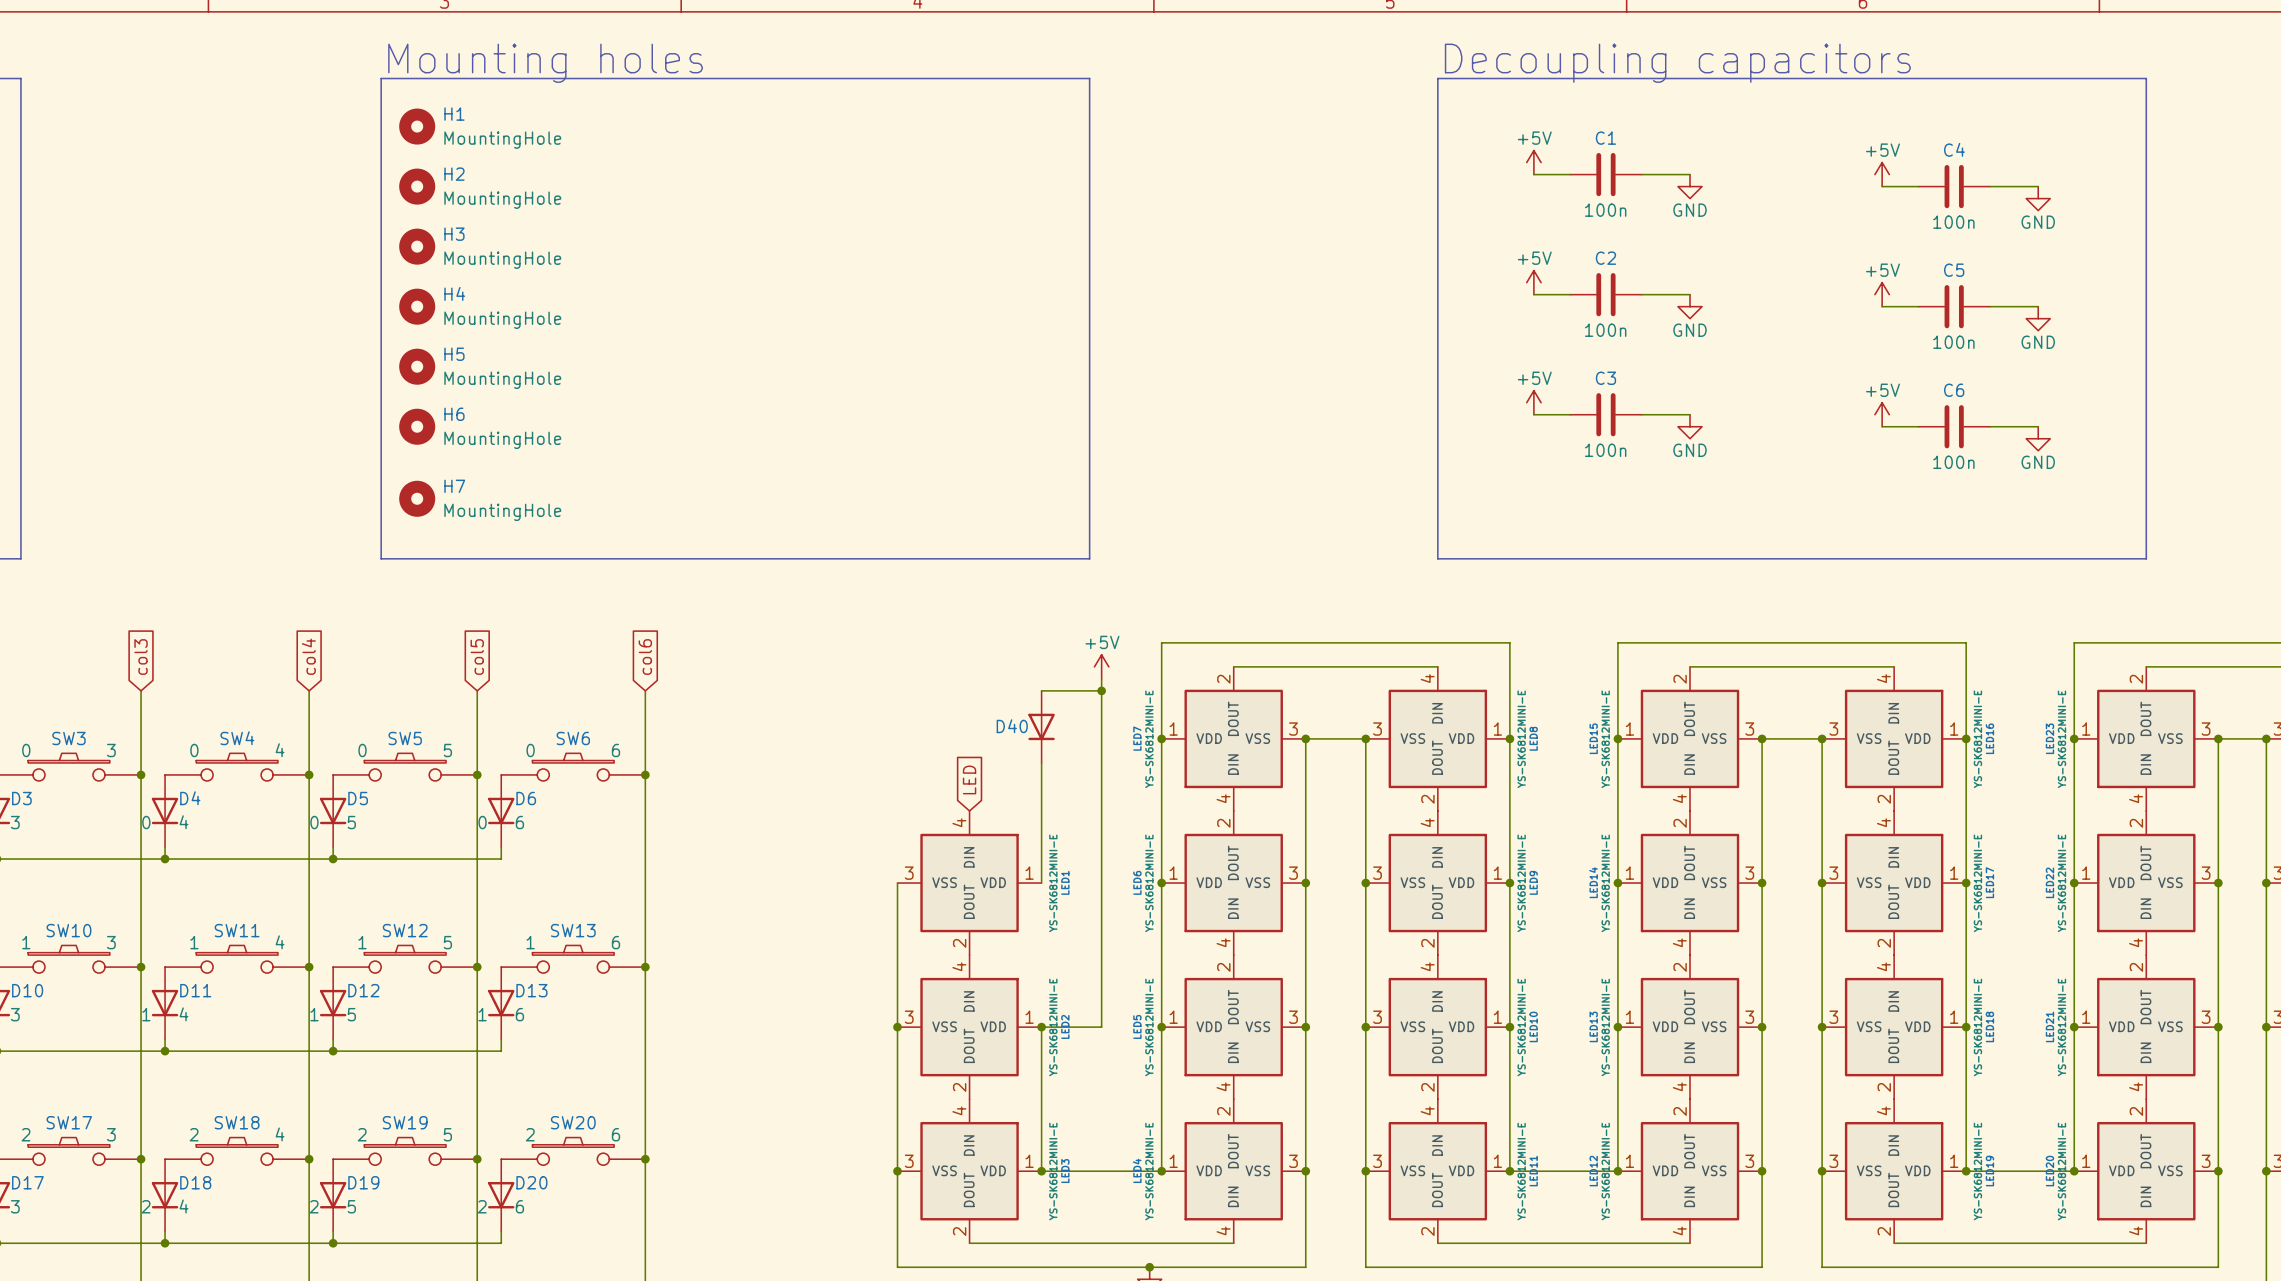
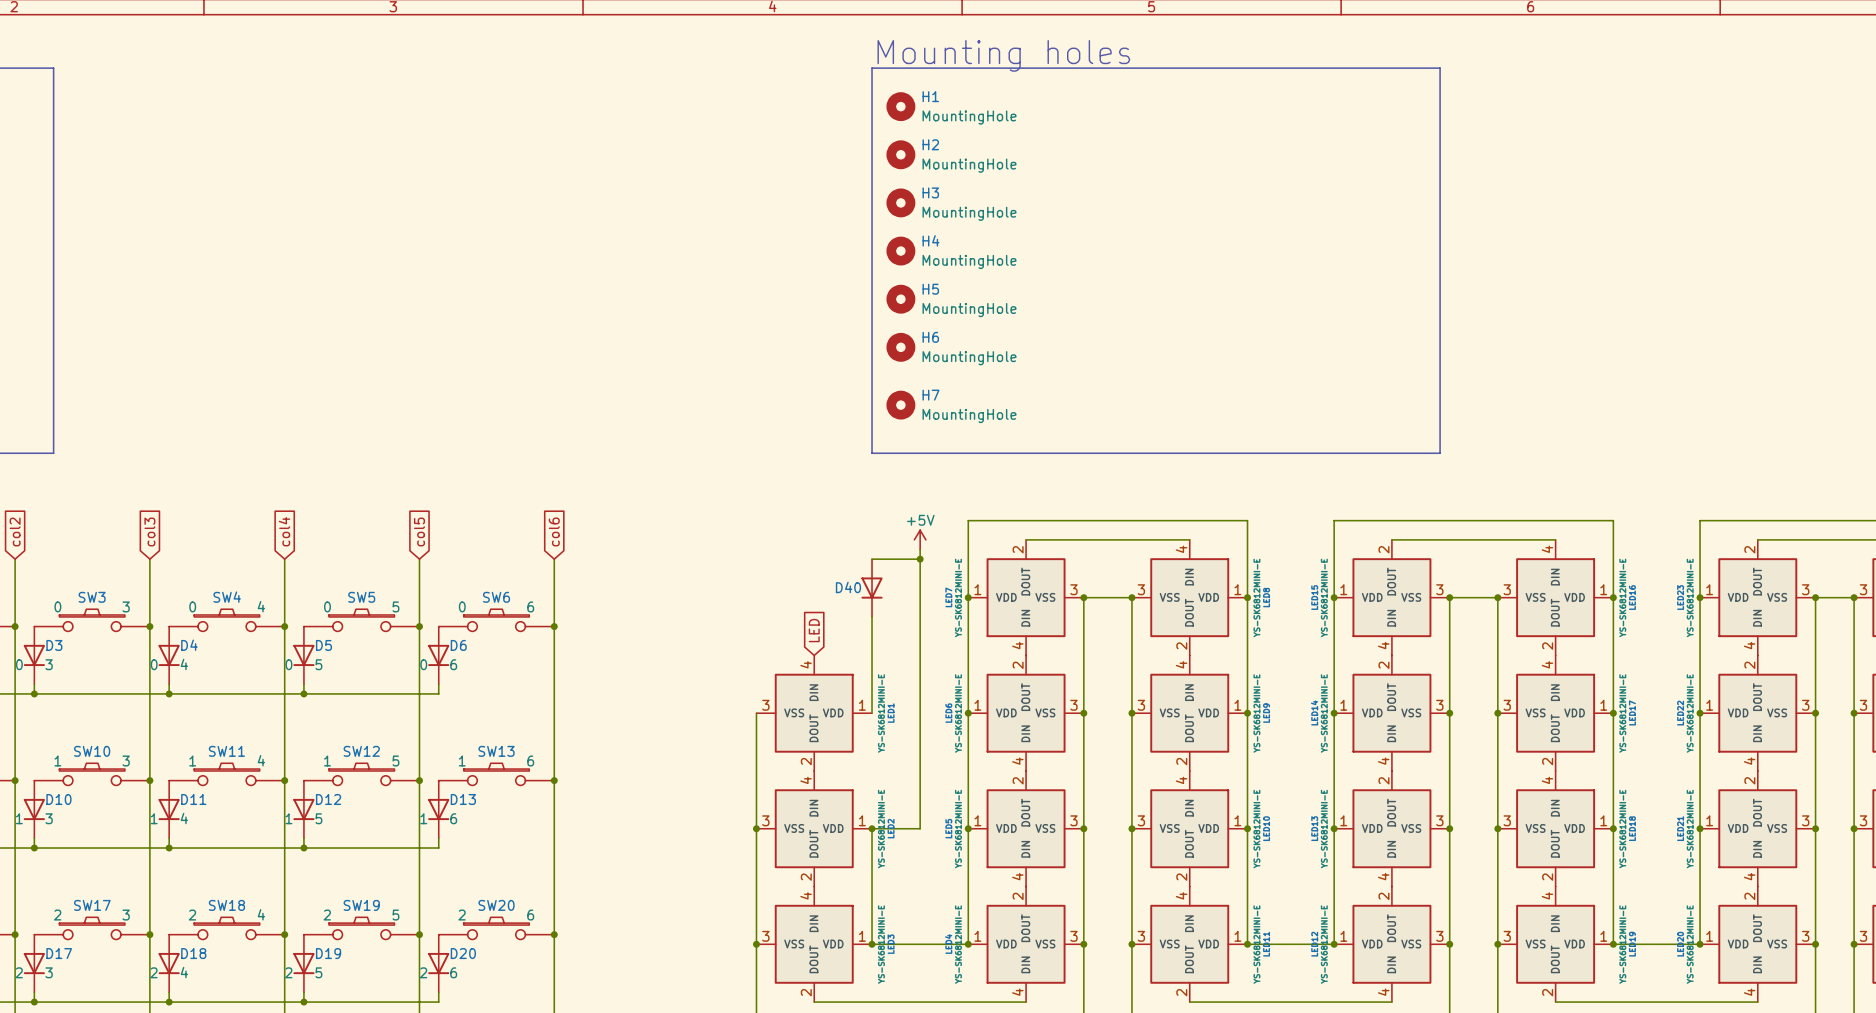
text: Mounting holes (545, 63) -> none
text: none -> Mounting holes (1003, 55)
text: Decoupling capacitors (1677, 63) -> none
line: (1041, 78) (381, 78) (381, 558) (1041, 558) -> (872, 68) (872, 453)
line: (1089, 78) (1089, 558) -> (910, 68) (1189, 68)
line: (1437, 78) (1437, 558) -> (910, 453) (1189, 453)
line: (1750, 78) (2146, 78) (2146, 558) (1750, 558) -> (1440, 68) (1440, 453)
H1 position: (417, 126) -> (900, 106)
power symbol: +5V (1533, 162) -> none
wire: (1533, 174) (1569, 174) -> none
C1: 100n (1605, 174) -> none
wire: (1641, 174) (1690, 174) -> none
power symbol: +5V (1882, 174) -> none
H2 position: (417, 186) -> (900, 154)
power symbol: GND (1690, 186) -> none
wire: (1882, 186) (1918, 186) -> none
C4: 100n (1954, 186) -> none
wire: (1990, 186) (2038, 186) -> none
power symbol: GND (2038, 198) -> none
H3 position: (417, 246) -> (900, 202)
power symbol: +5V (1533, 282) -> none
wire: (1533, 294) (1569, 294) -> none
C2: 100n (1605, 294) -> none
wire: (1641, 294) (1690, 294) -> none
power symbol: +5V (1882, 294) -> none
H4 position: (417, 306) -> (900, 251)
power symbol: GND (1690, 306) -> none
wire: (1882, 306) (1918, 306) -> none
C5: 100n (1954, 306) -> none
wire: (1990, 306) (2038, 306) -> none
power symbol: GND (2038, 318) -> none
H5 position: (417, 366) -> (900, 299)
power symbol: +5V (1533, 402) -> none
wire: (1533, 414) (1569, 414) -> none
C3: 100n (1605, 414) -> none
wire: (1641, 414) (1690, 414) -> none
power symbol: +5V (1882, 414) -> none
H6 position: (417, 426) -> (900, 347)
power symbol: GND (1690, 426) -> none
wire: (1882, 426) (1918, 426) -> none
C6: 100n (1954, 426) -> none
wire: (1990, 426) (2038, 426) -> none
power symbol: GND (2038, 438) -> none
H7 position: (417, 498) -> (900, 405)

